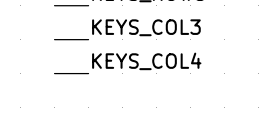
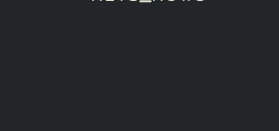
wire: (54, 5) (88, 5) -> none
label: KEYS_COL3 (146, 27) -> none
wire: (54, 39) (88, 39) -> none
label: KEYS_COL4 (146, 61) -> none
wire: (54, 73) (88, 73) -> none

